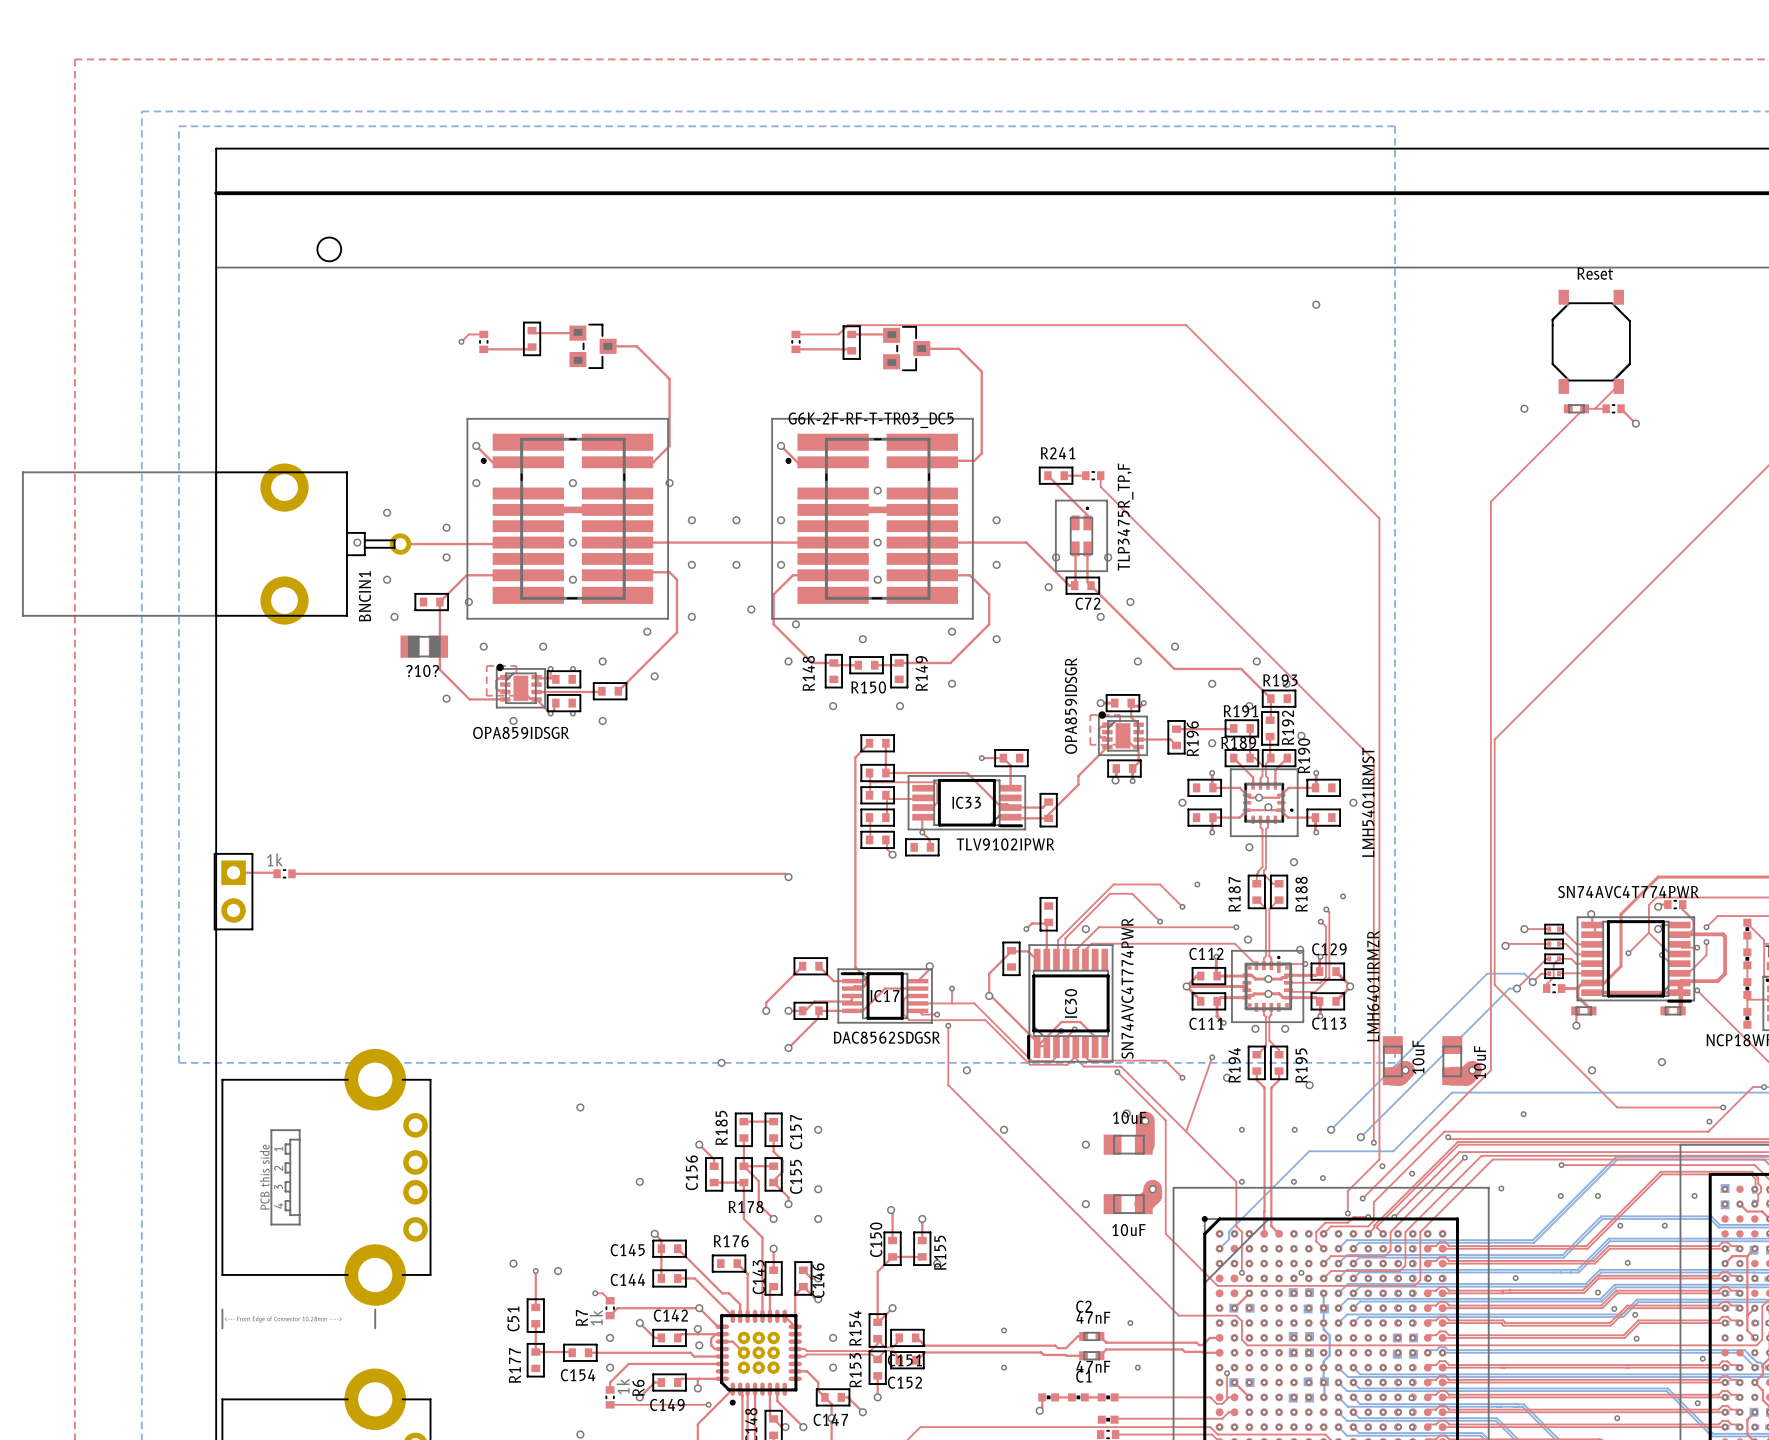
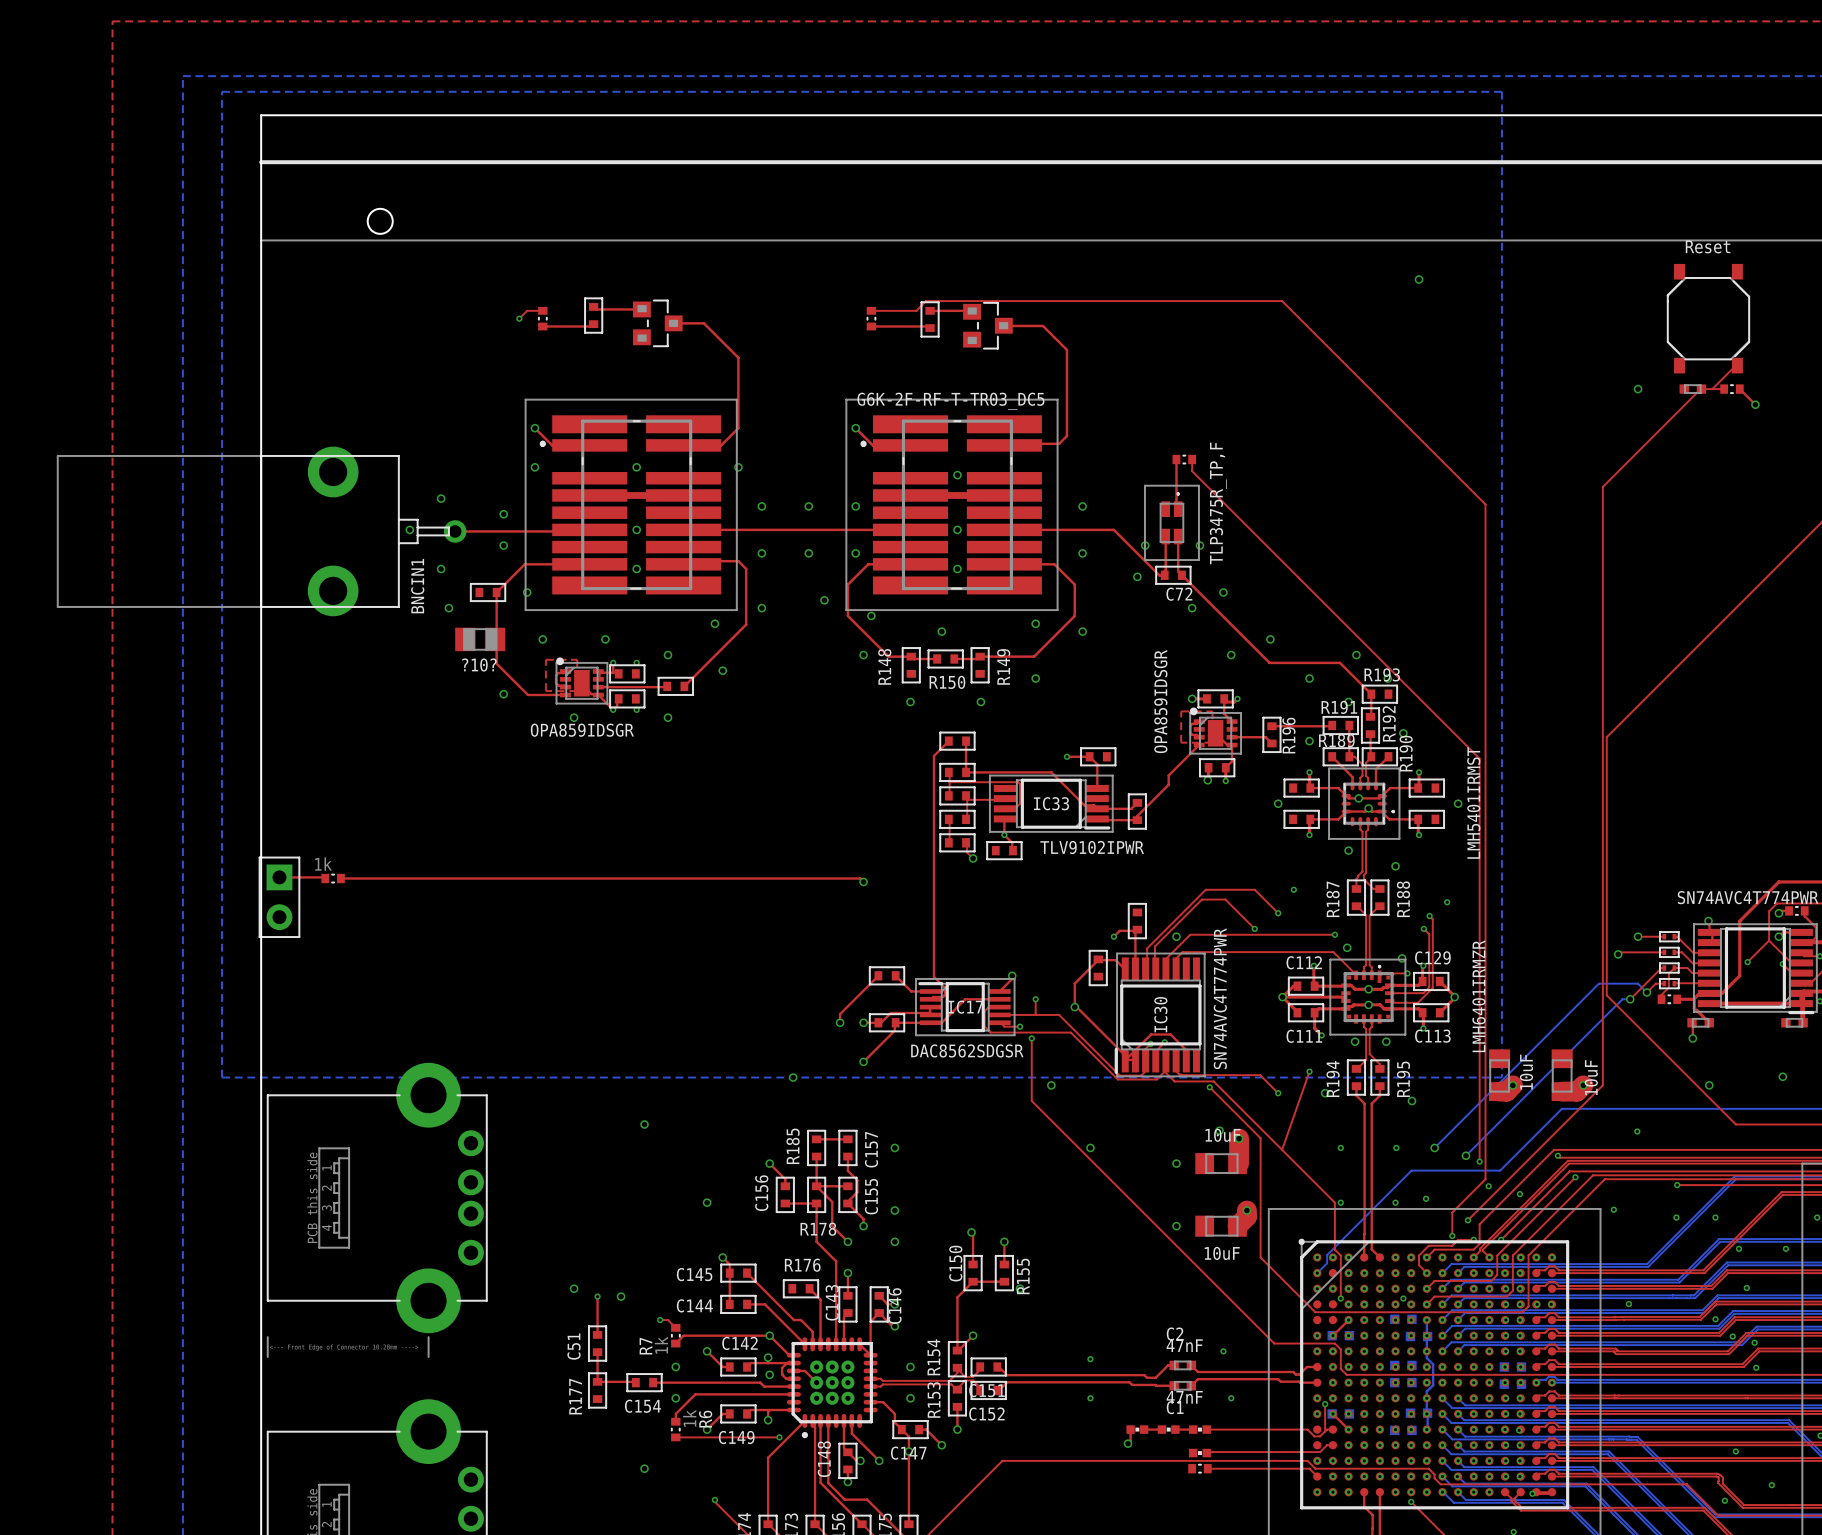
top track: (1047, 475) (1087, 515) (1087, 522) -> (1176, 459) (1176, 507) (1178, 509)
R241: (1056, 475) -> none
top track: (1064, 475) (1085, 475) -> none

